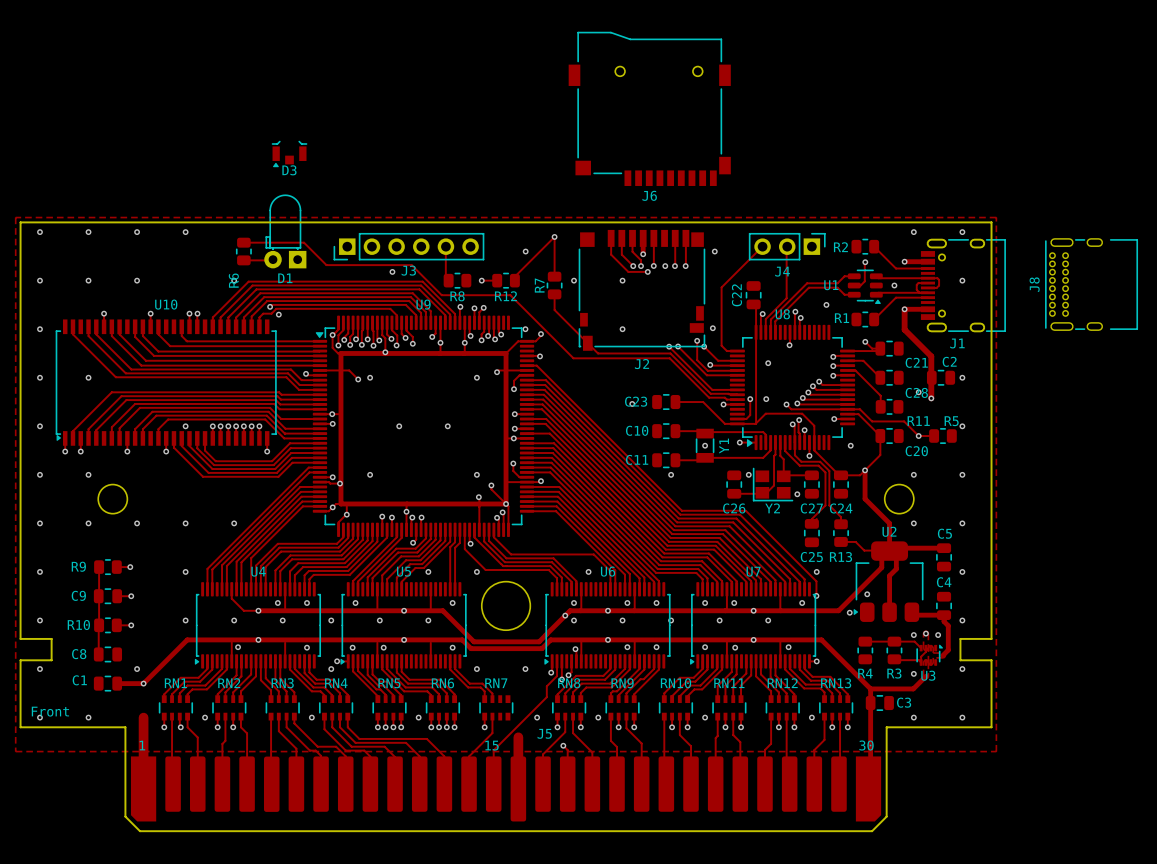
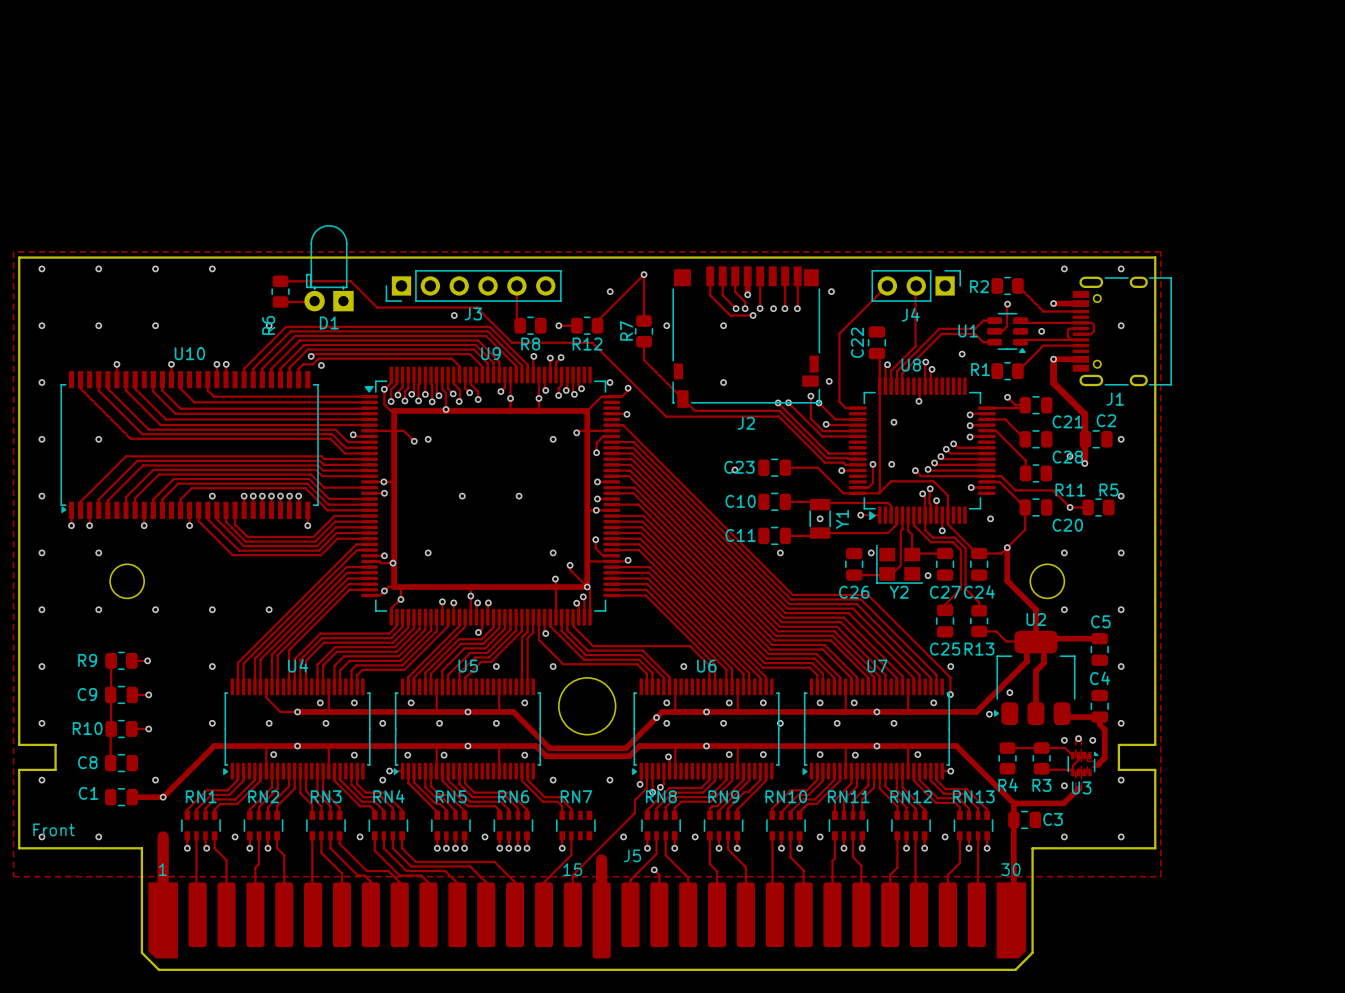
J6: (649, 108) -> none
D3: (289, 154) -> none
J8: (1091, 284) -> none

